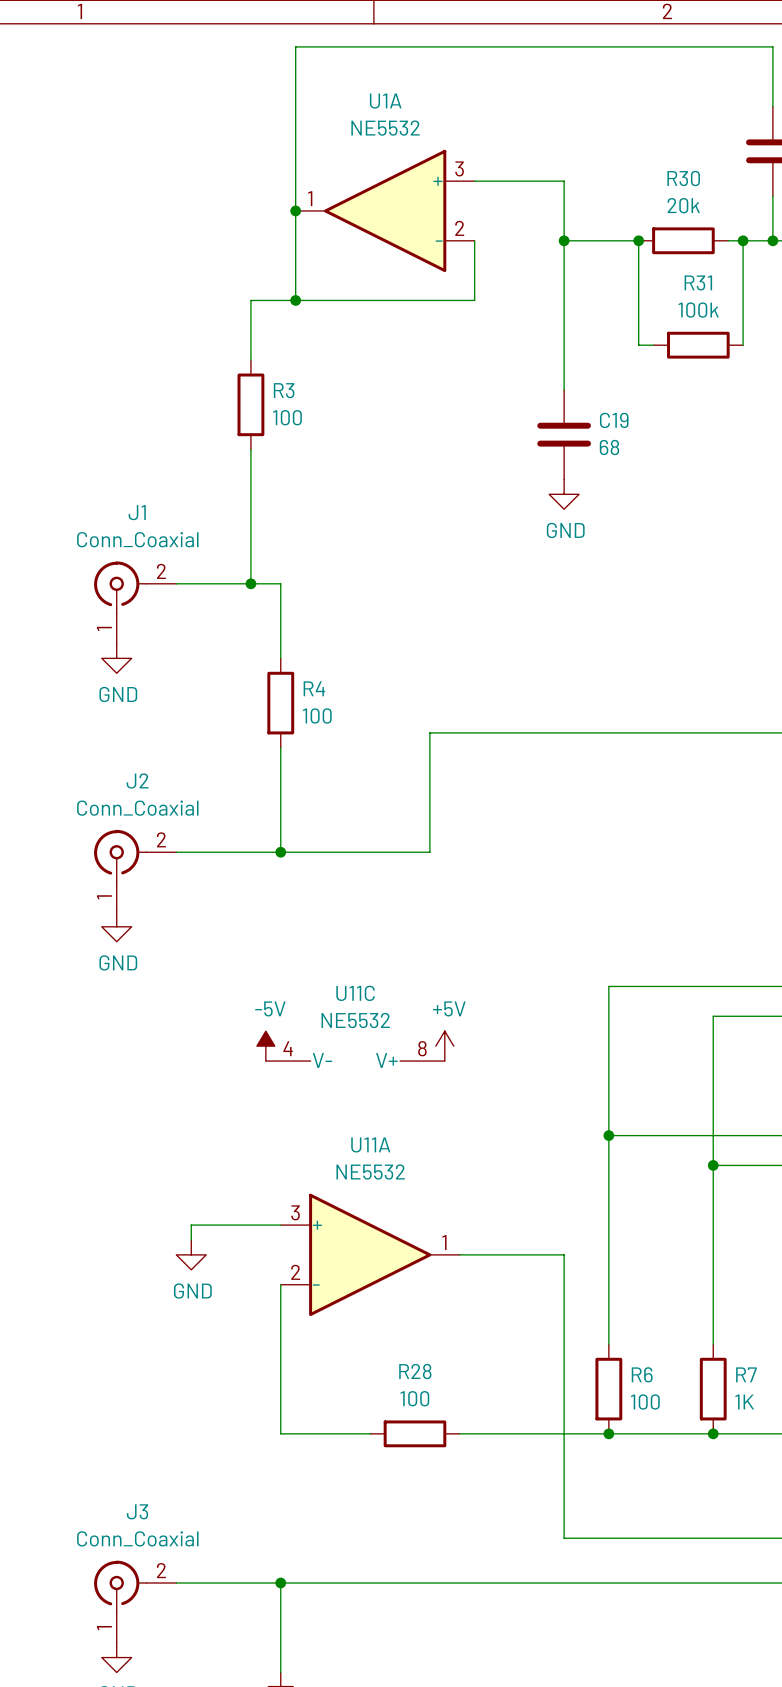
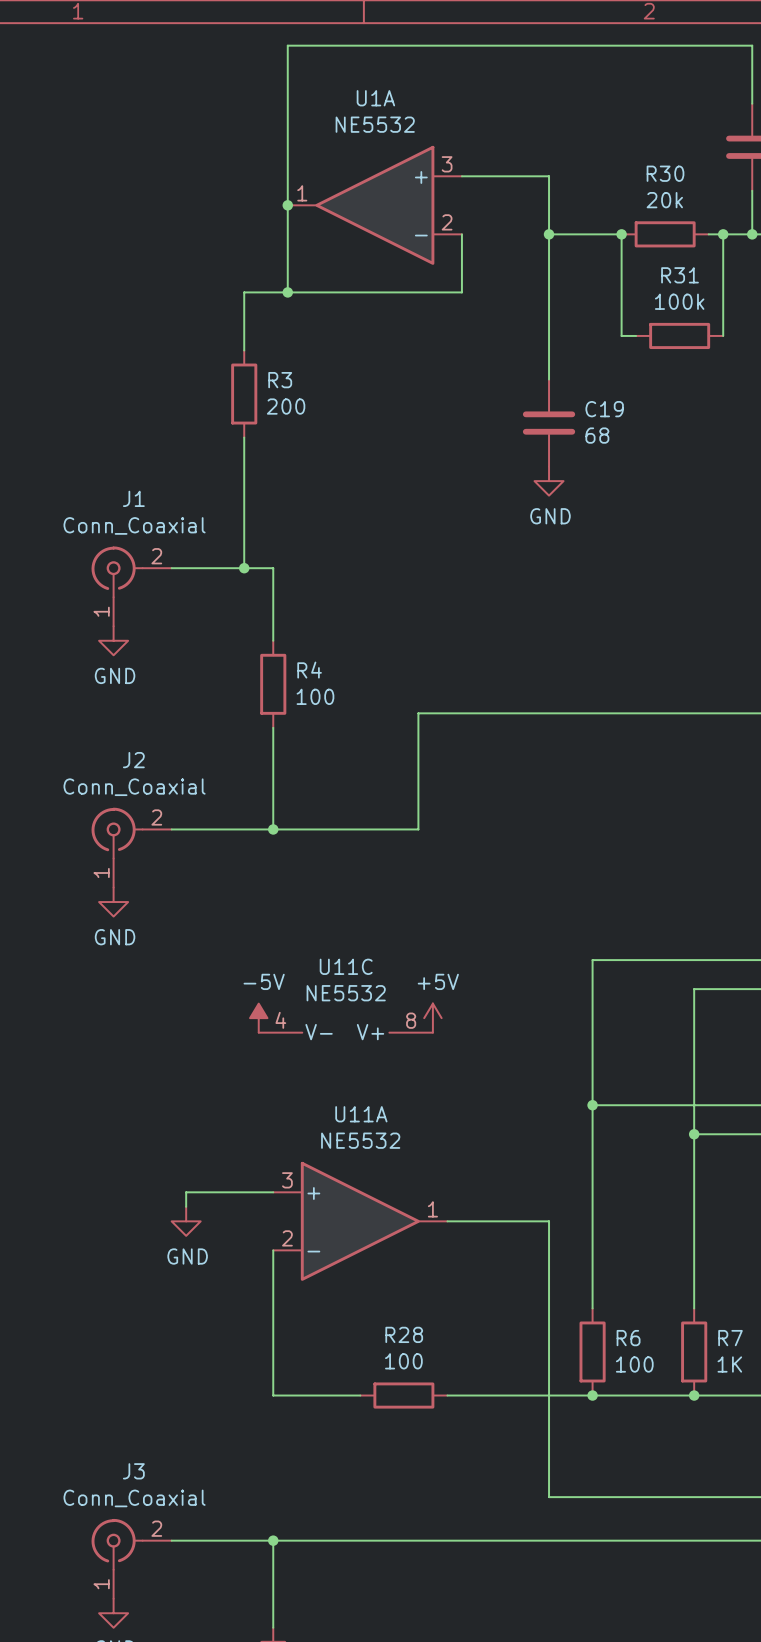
R3 value: 100 (287, 417) -> 200 (286, 406)

